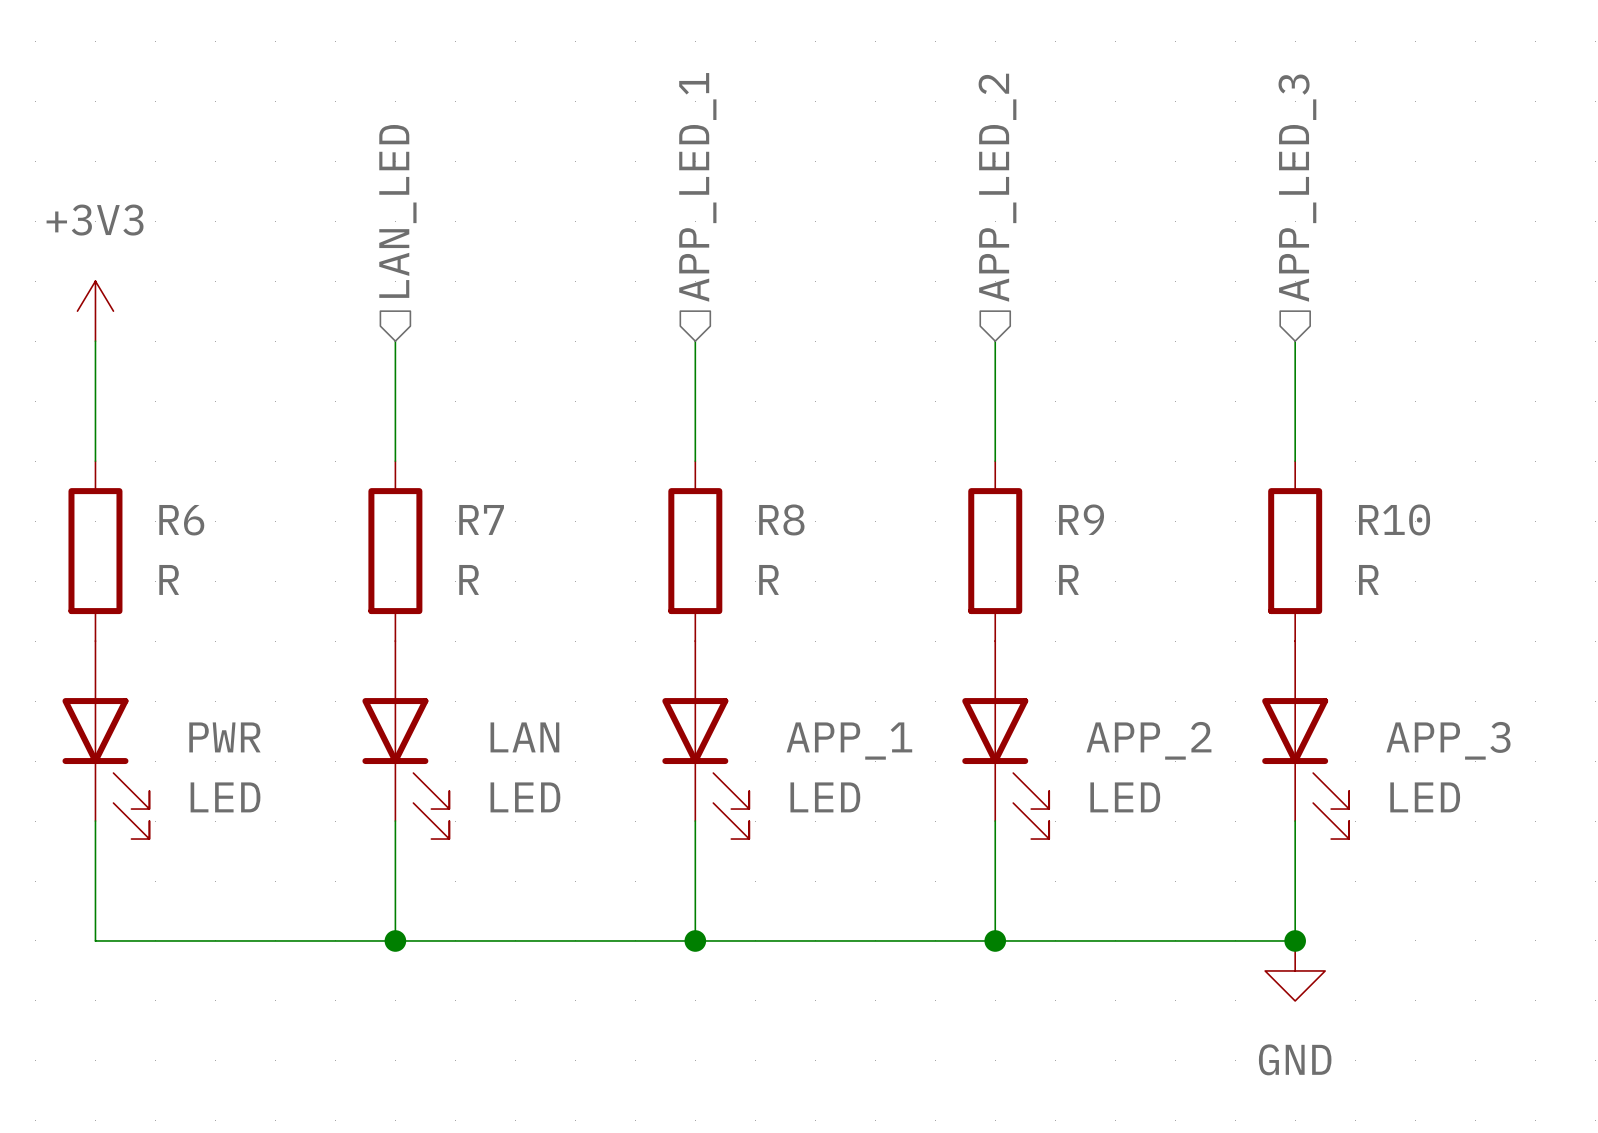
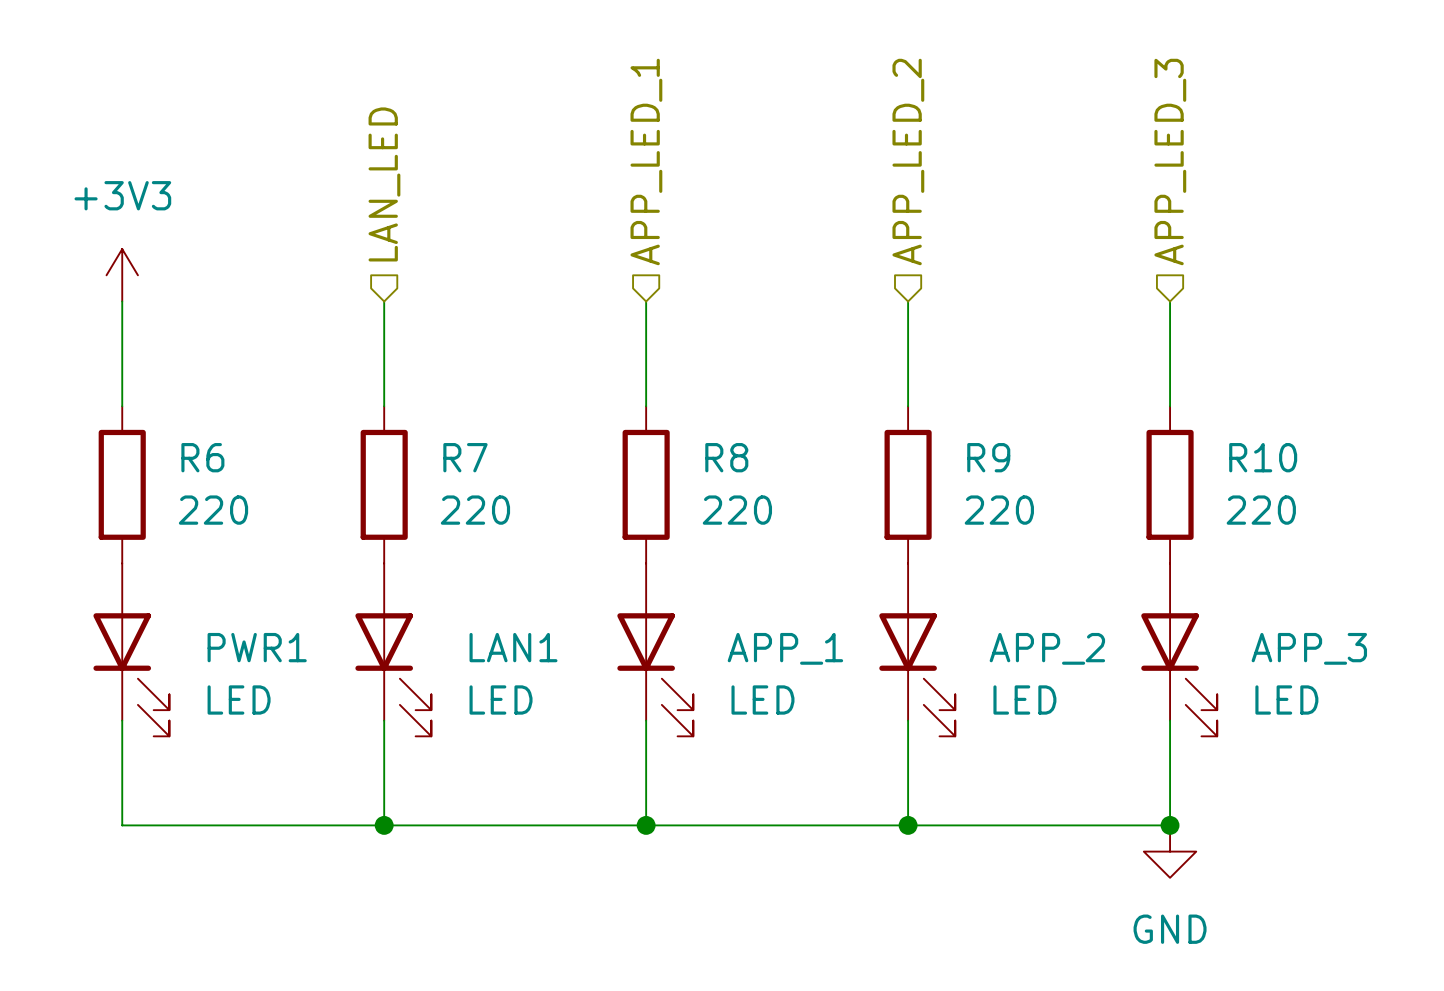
R6 value: R (169, 579) -> 220 (213, 510)
R7 value: R (469, 579) -> 220 (475, 510)
R8 value: R (769, 579) -> 220 (737, 510)
R9 value: R (1068, 579) -> 220 (999, 510)
R10 value: R (1368, 579) -> 220 (1261, 510)
PWR name: PWR (224, 737) -> PWR1 (257, 647)
LAN name: LAN (524, 737) -> LAN1 (513, 647)

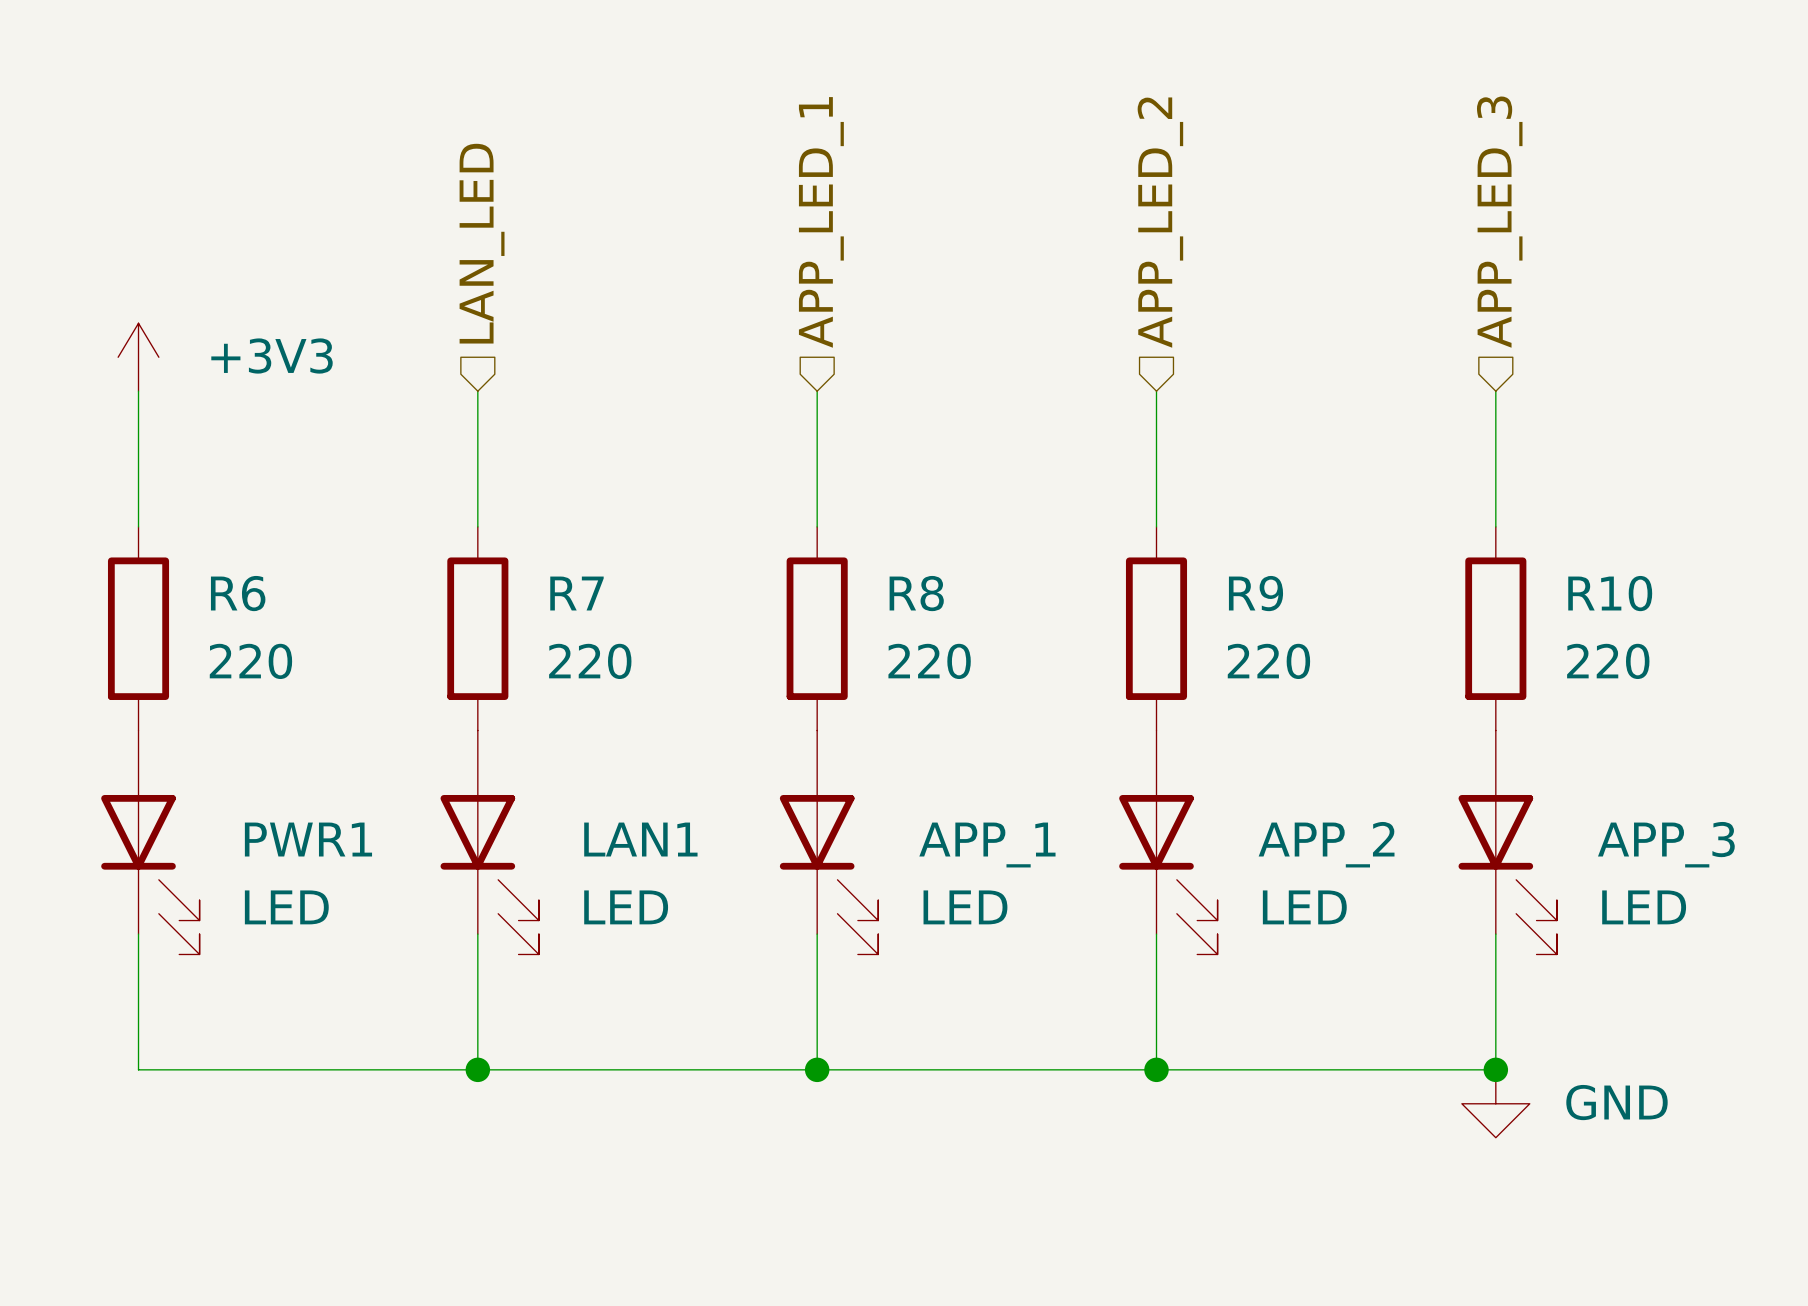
power symbol text position: +3V3 (122, 195) -> +3V3 (272, 356)
power symbol text position: GND (1170, 929) -> GND (1616, 1102)

